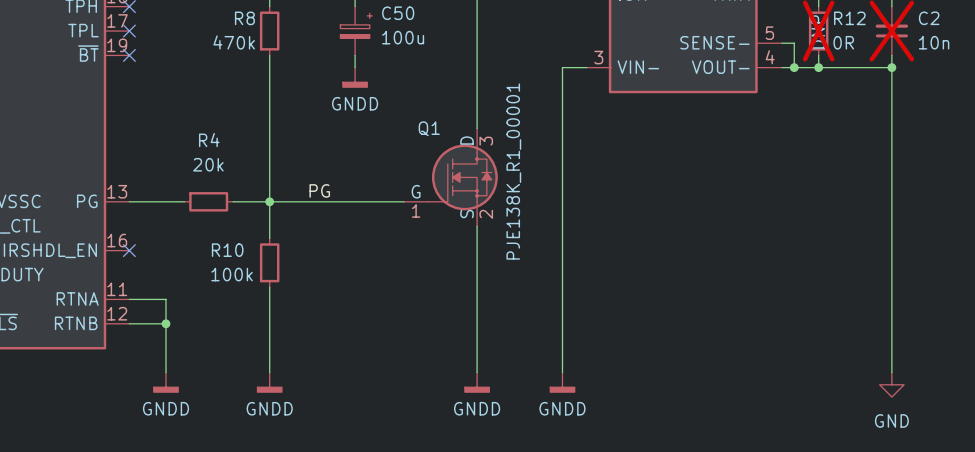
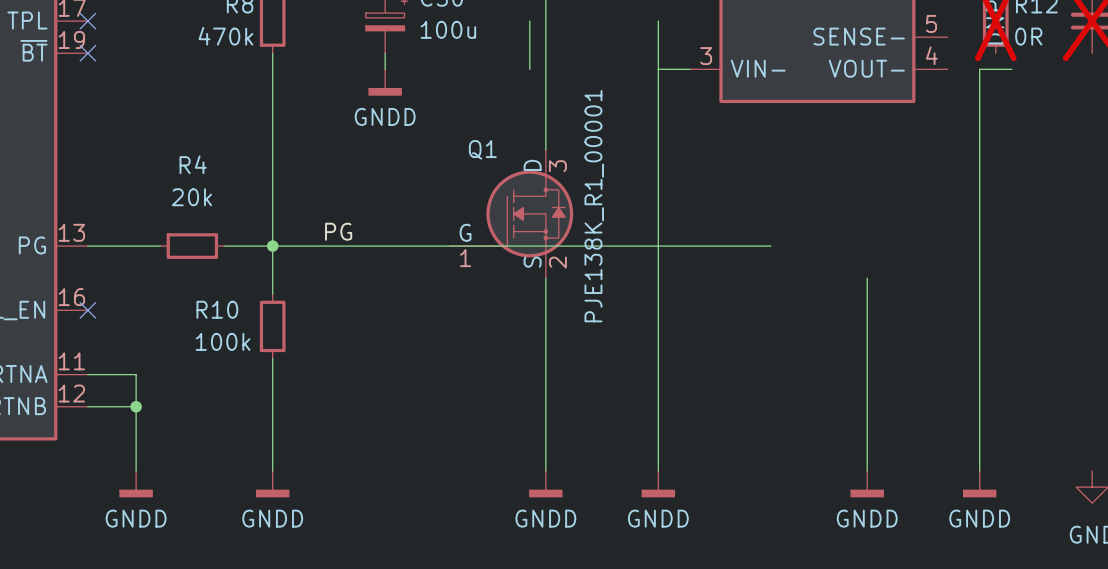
wire: none -> (529, 21) (529, 69)
wire: none -> (658, 21) (658, 69)
wire: (782, 43) (794, 43) (794, 67) -> none
wire: (818, 55) (818, 67) -> none
wire: (891, 55) (891, 372) -> none
wire: (782, 67) (806, 67) -> (979, 471) (979, 69)
junction: (794, 67) -> none
junction: (818, 67) -> none
wire: (830, 67) (891, 67) -> none
junction: (891, 67) -> none
wire: none -> (449, 246) (770, 246)
wire: none -> (867, 278) (867, 471)
power symbol: none -> GNDD (867, 483)
power symbol: none -> GNDD (979, 483)

